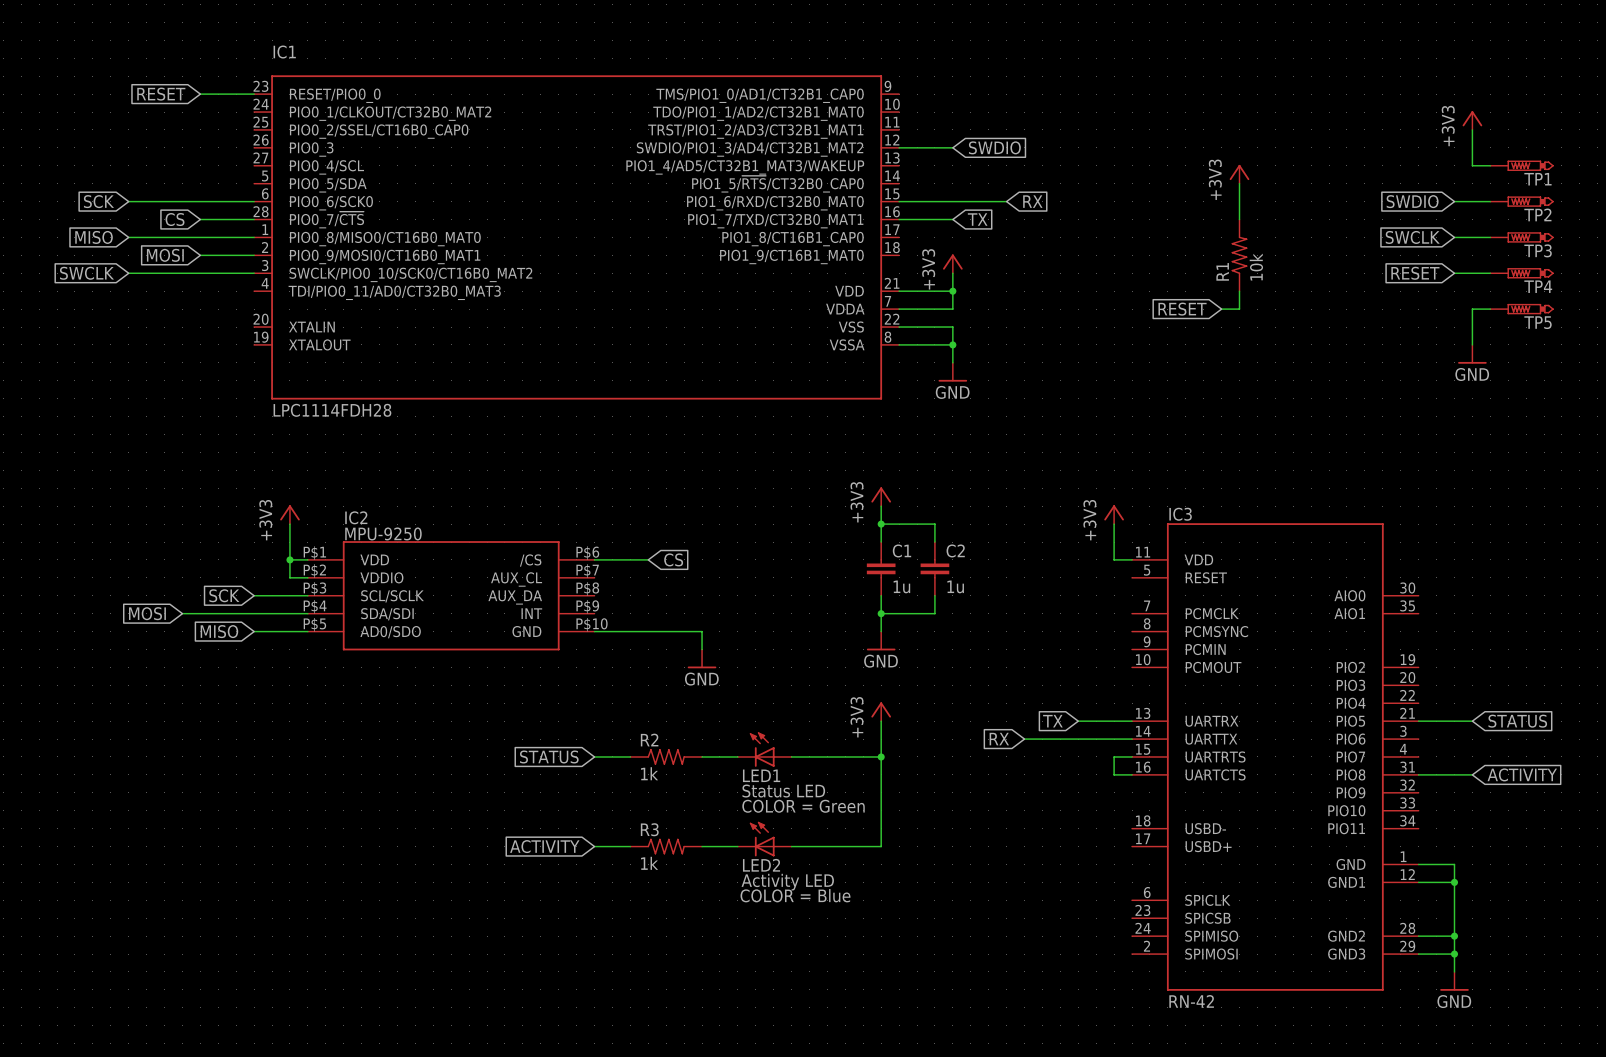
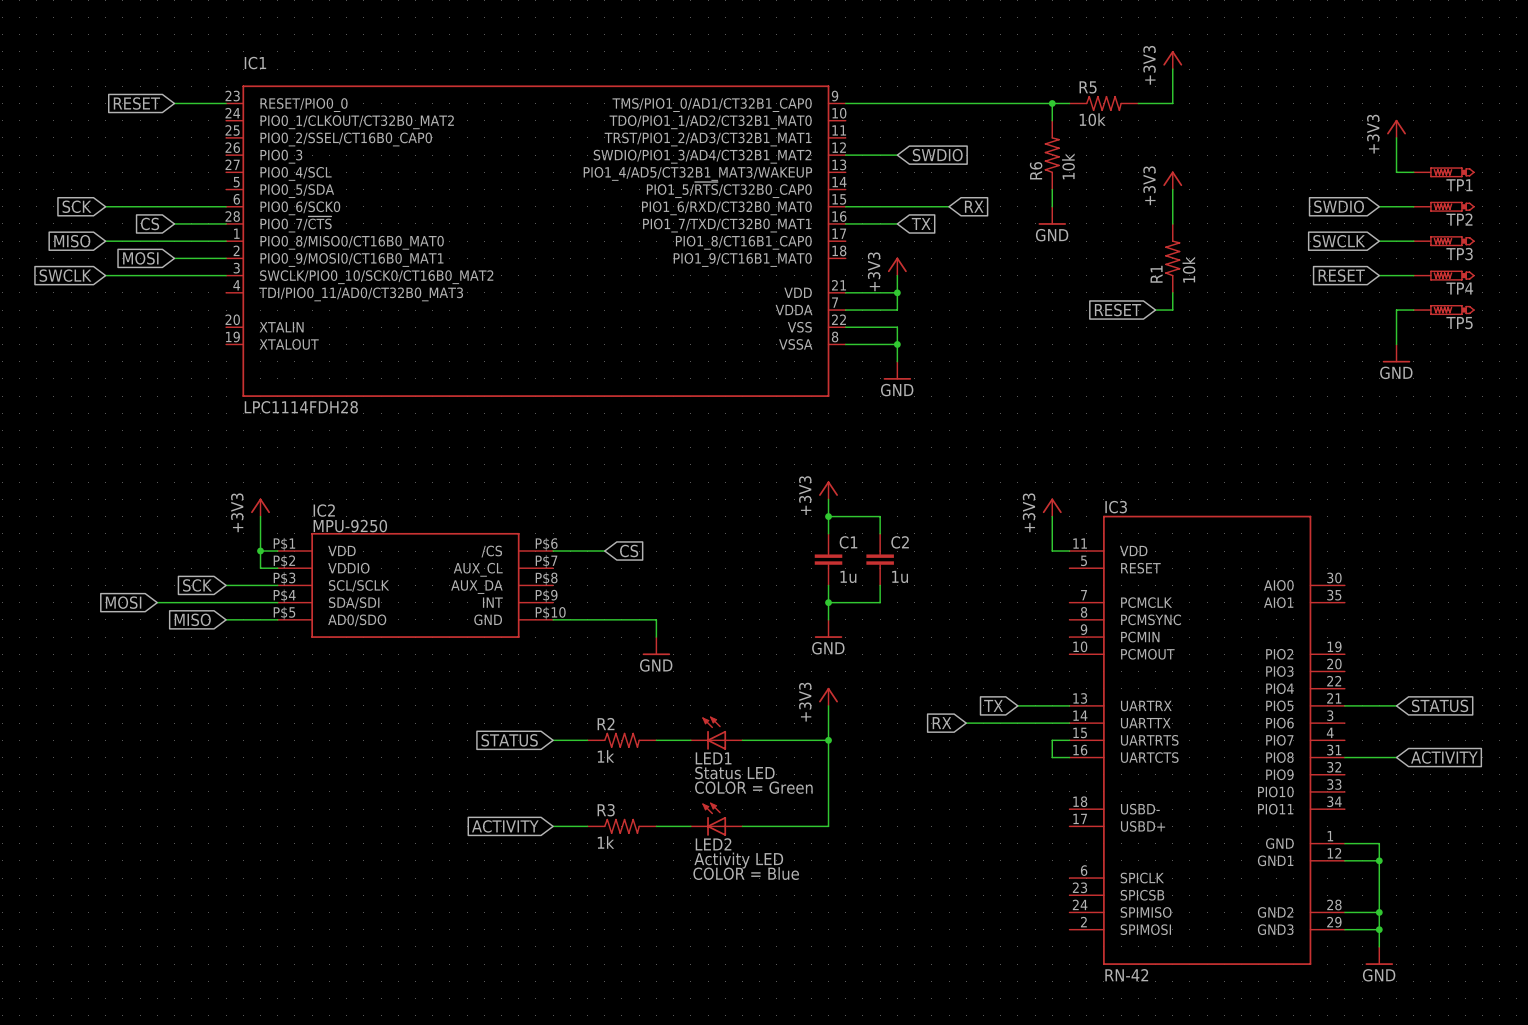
power symbol: none -> +3V3 (1172, 60)
wire: none -> (1172, 69) (1172, 103) (1138, 103)
wire: none -> (845, 103) (1069, 103)
wire: none -> (1052, 103) (1052, 120)
junction: none -> (1052, 103)
R5: none -> 10k (1103, 103)
R6: none -> 10k (1052, 155)
wire: none -> (1052, 189) (1052, 206)
power symbol: none -> GND (1052, 215)

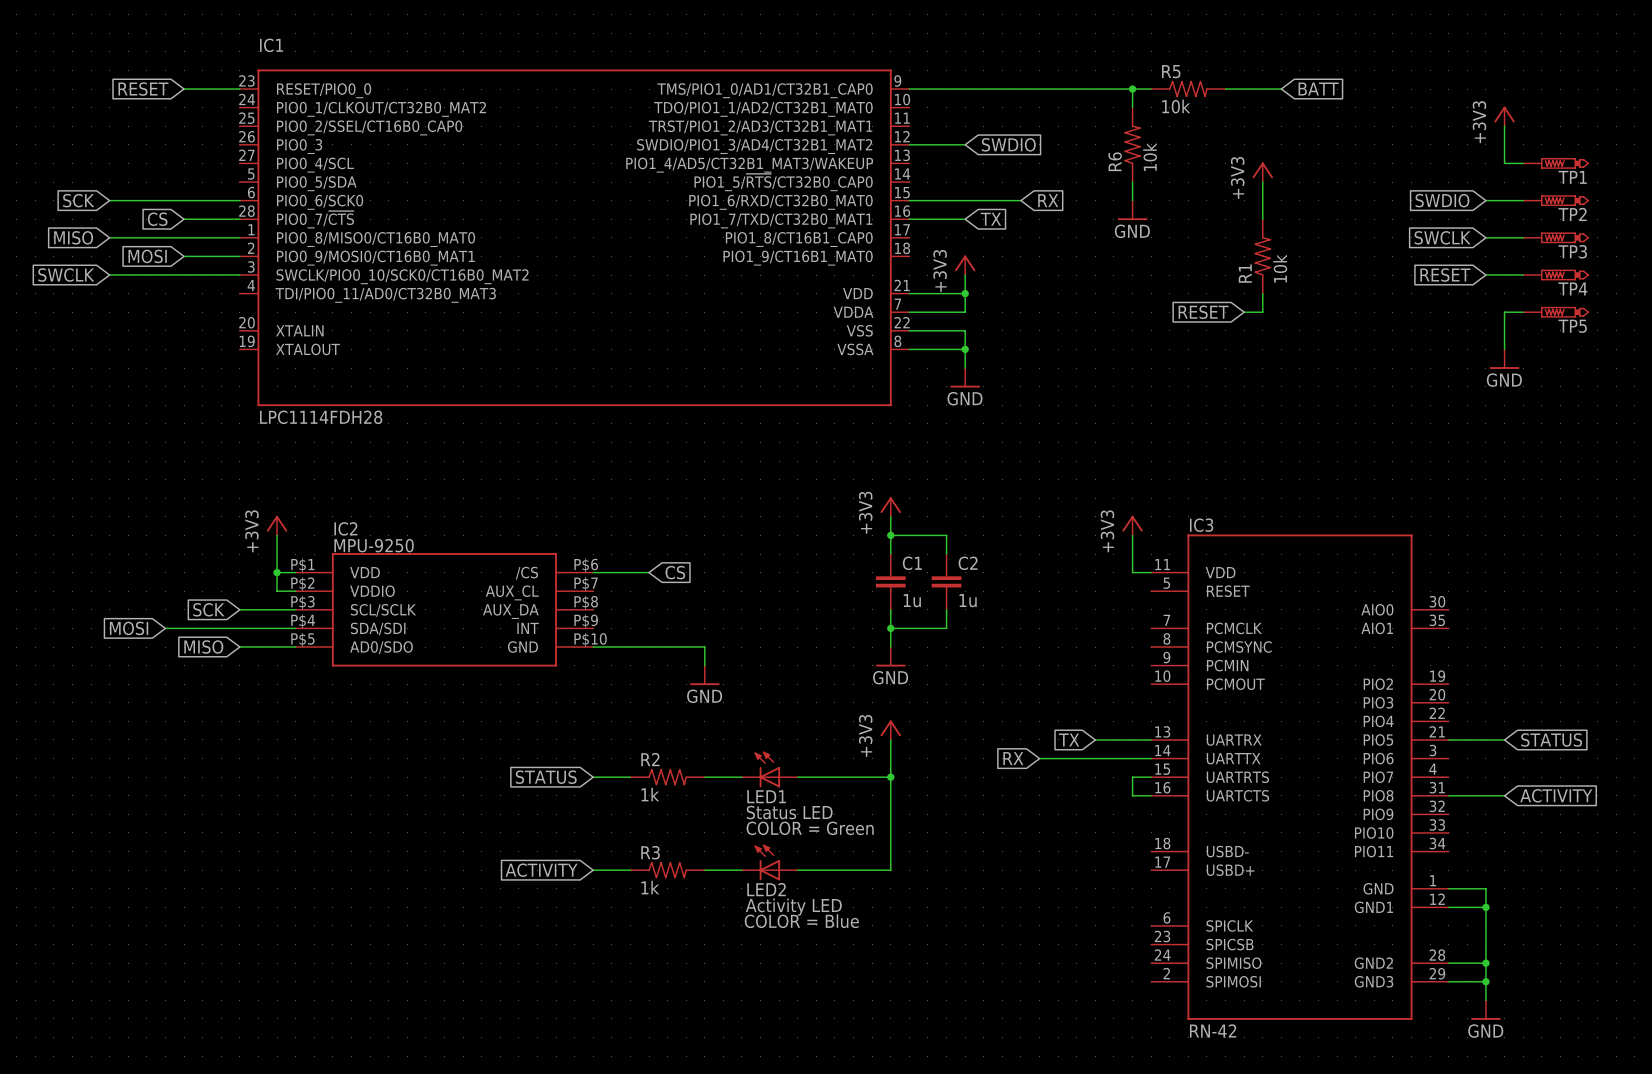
power symbol: +3V3 (1172, 60) -> none
wire: (1172, 69) (1172, 103) -> (1281, 89) (1262, 89)
global label: none -> BATT (1318, 89)

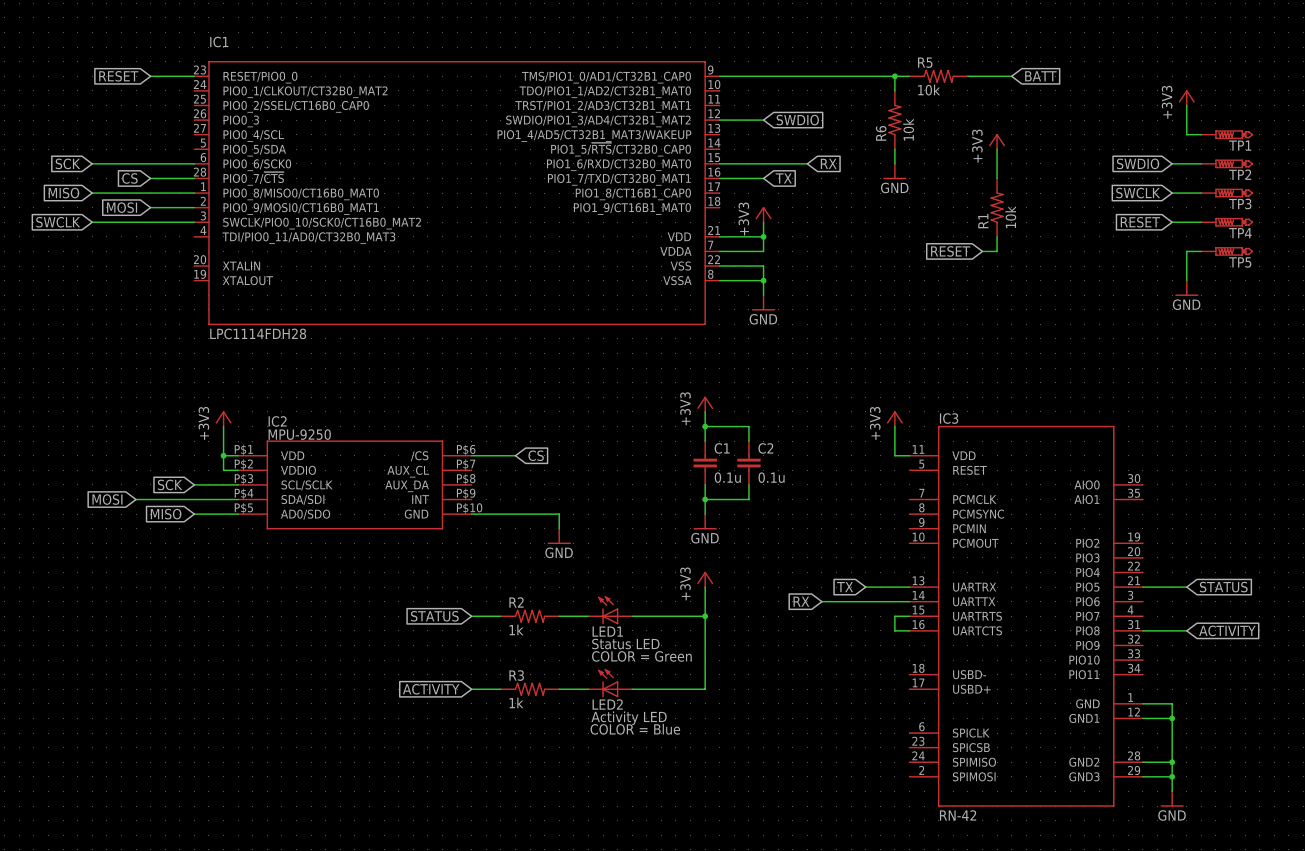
C1 value: 1u (912, 600) -> 0.1u (727, 477)
C2 value: 1u (968, 600) -> 0.1u (771, 477)

